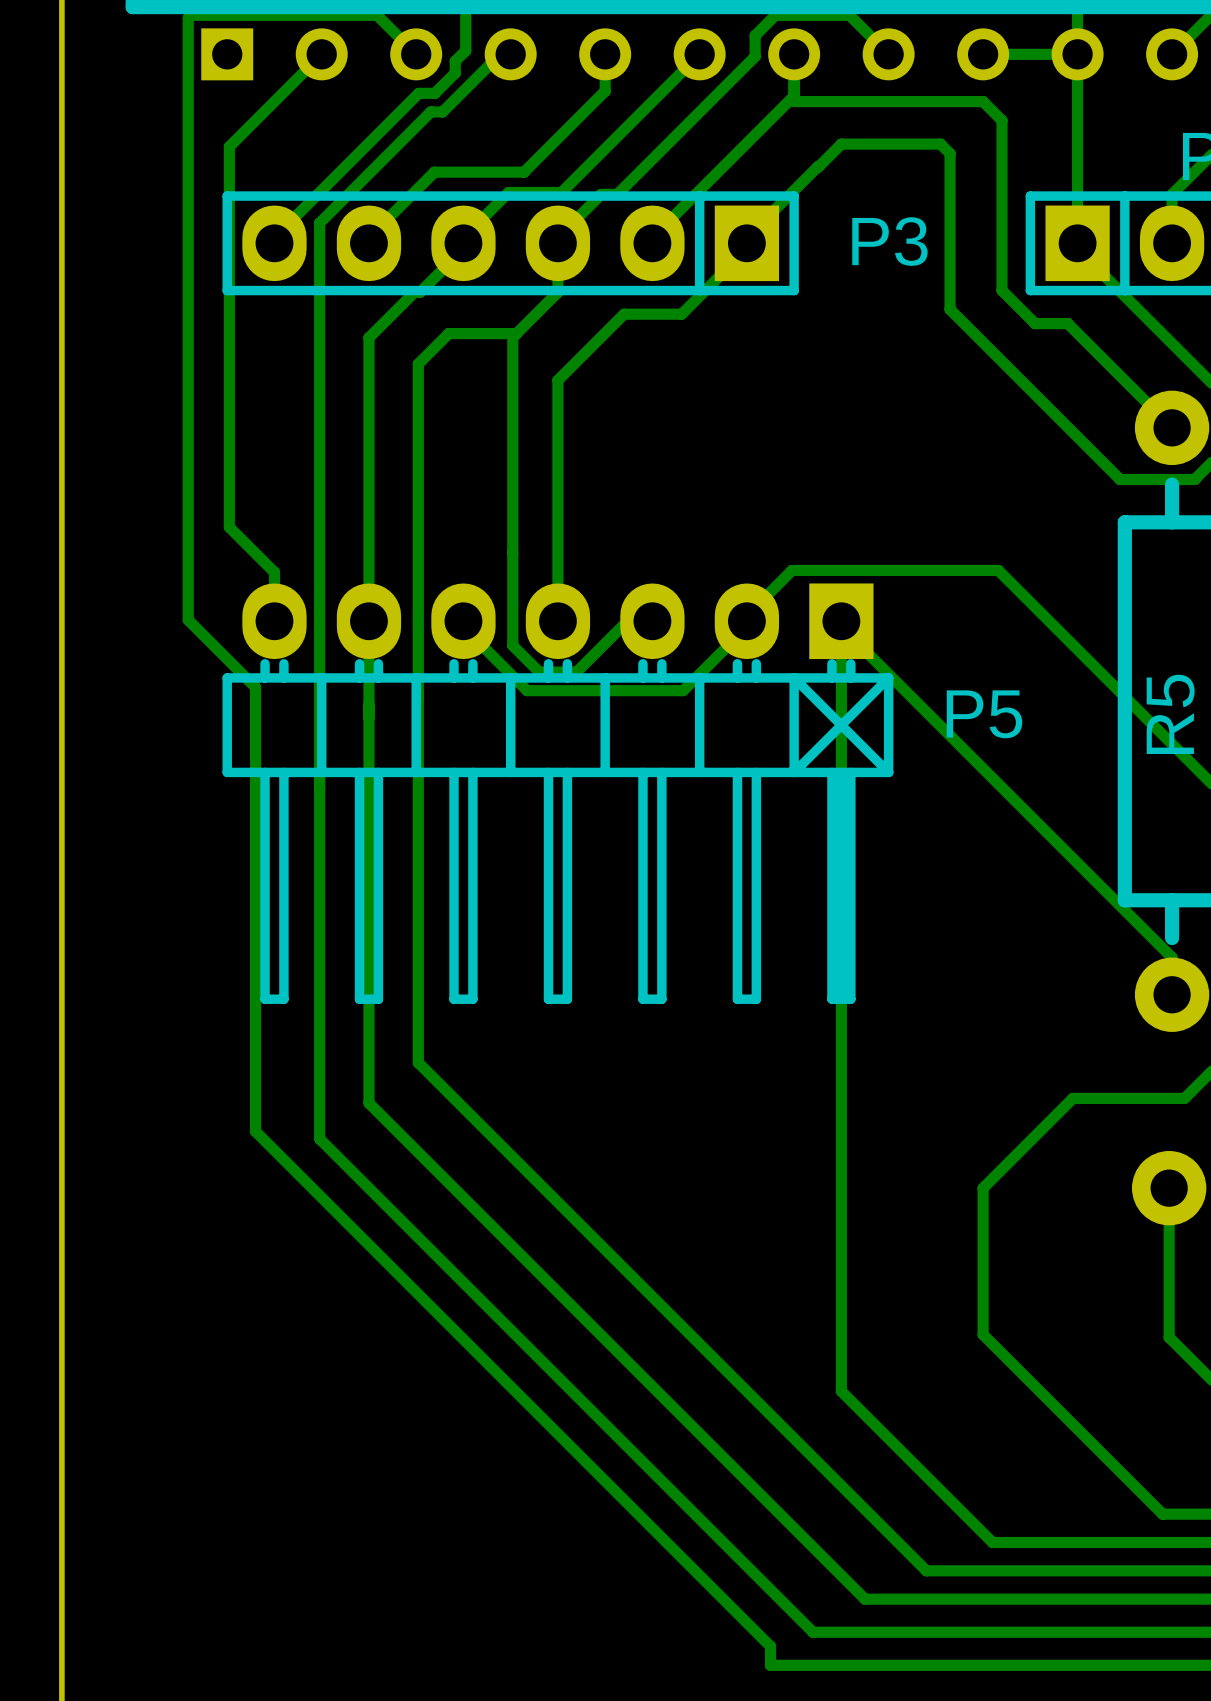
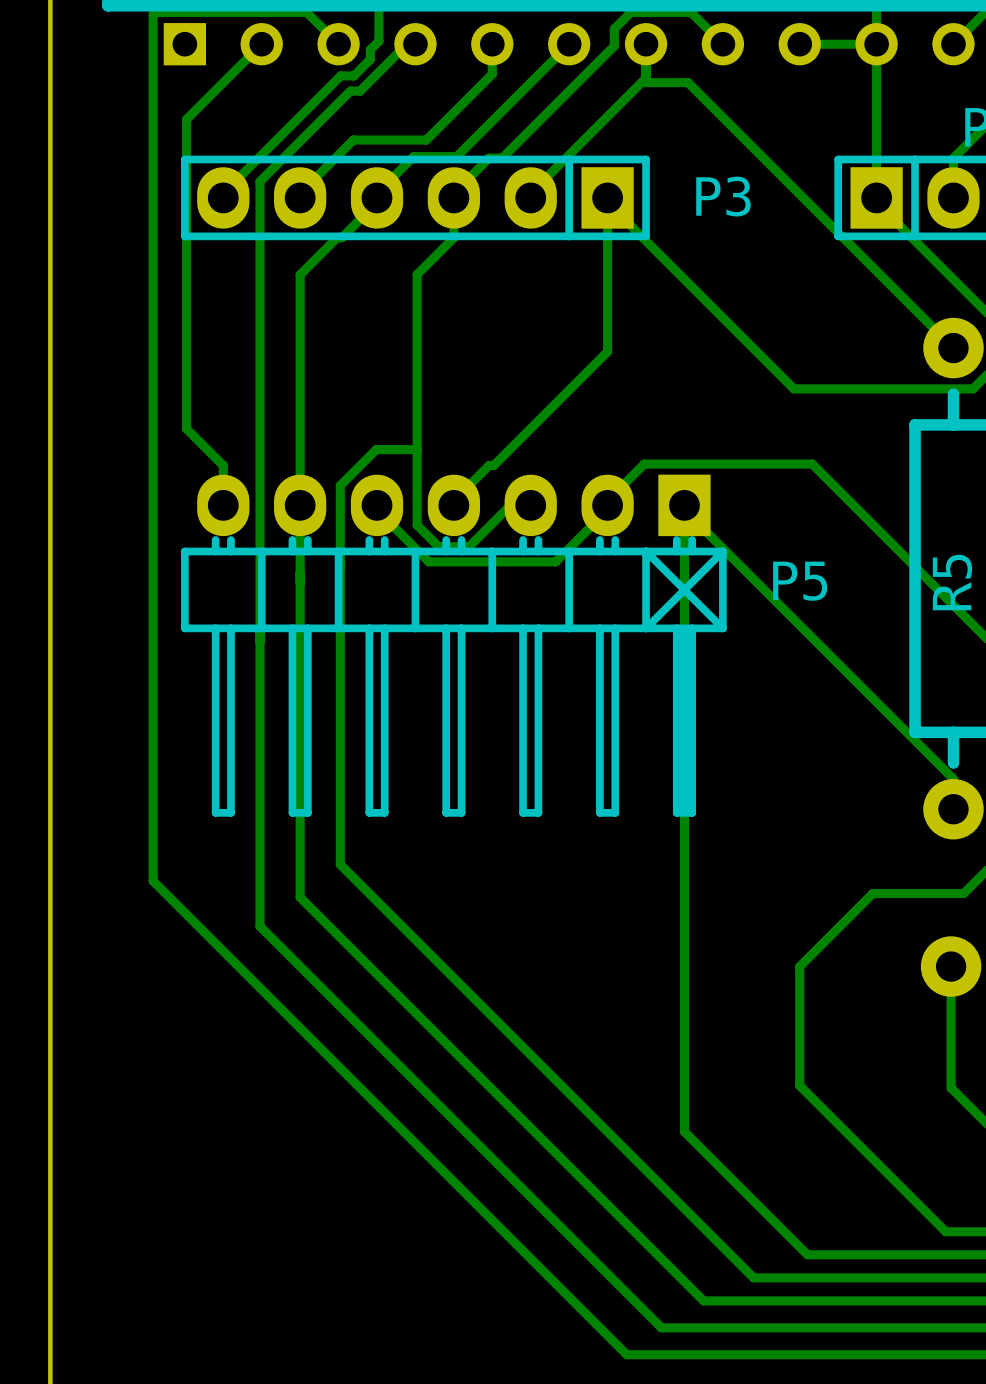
bottom track: (845, 101) (983, 101) (1002, 120) (1002, 290) (1035, 323) (1067, 323) -> (688, 82) (868, 263)
bottom track: (746, 243) (746, 237) (841, 144) (940, 144) (950, 153) (950, 309) (1120, 479) (1196, 478) -> (453, 500) (489, 465) (493, 465) (607, 351) (607, 202) (793, 388) (973, 388)
bottom track: (746, 248) (681, 314) (624, 314) (557, 380) (557, 615) -> none
bottom track: (516, 333) (448, 333) (418, 364) (418, 596) -> (417, 449) (376, 449) (340, 485)
bottom track: (188, 620) (255, 687) (255, 1131) (770, 1646) (770, 1665) -> (153, 504) (153, 881) (626, 1354)

